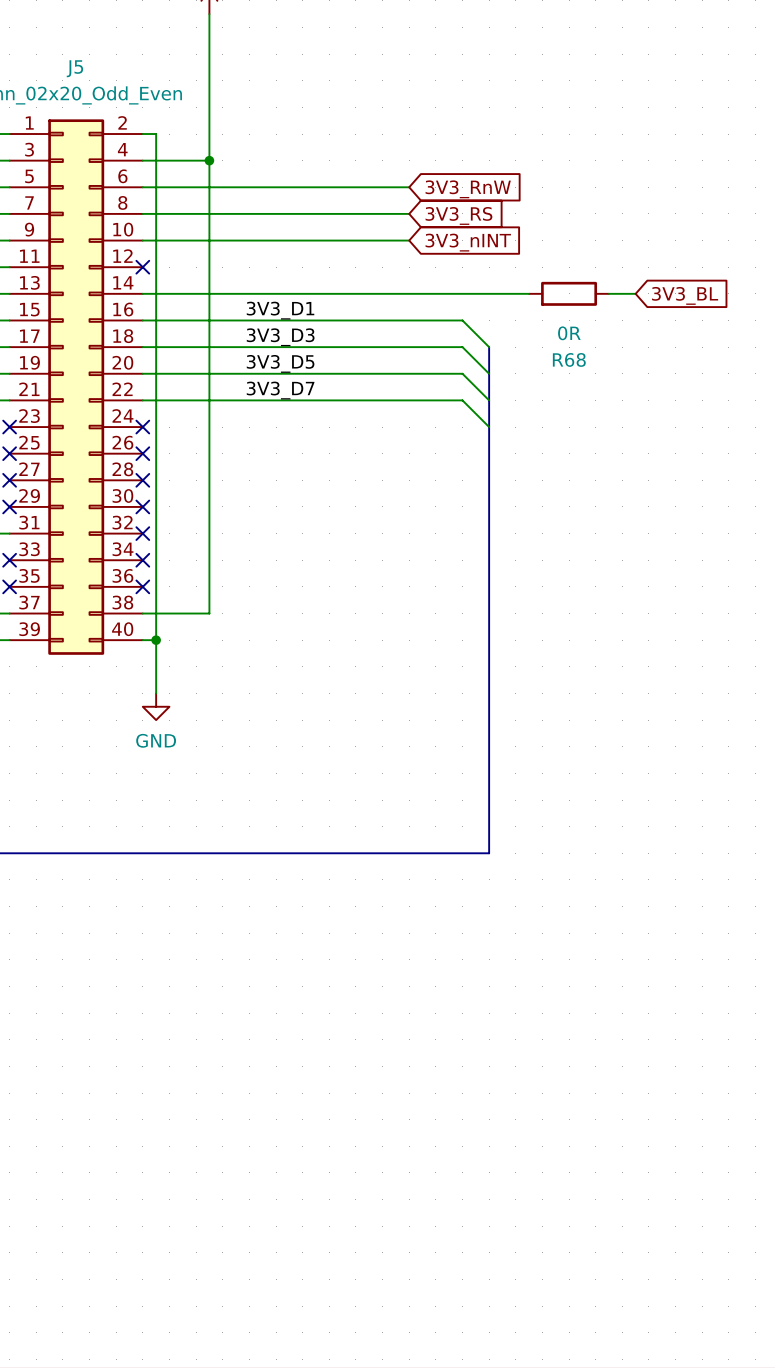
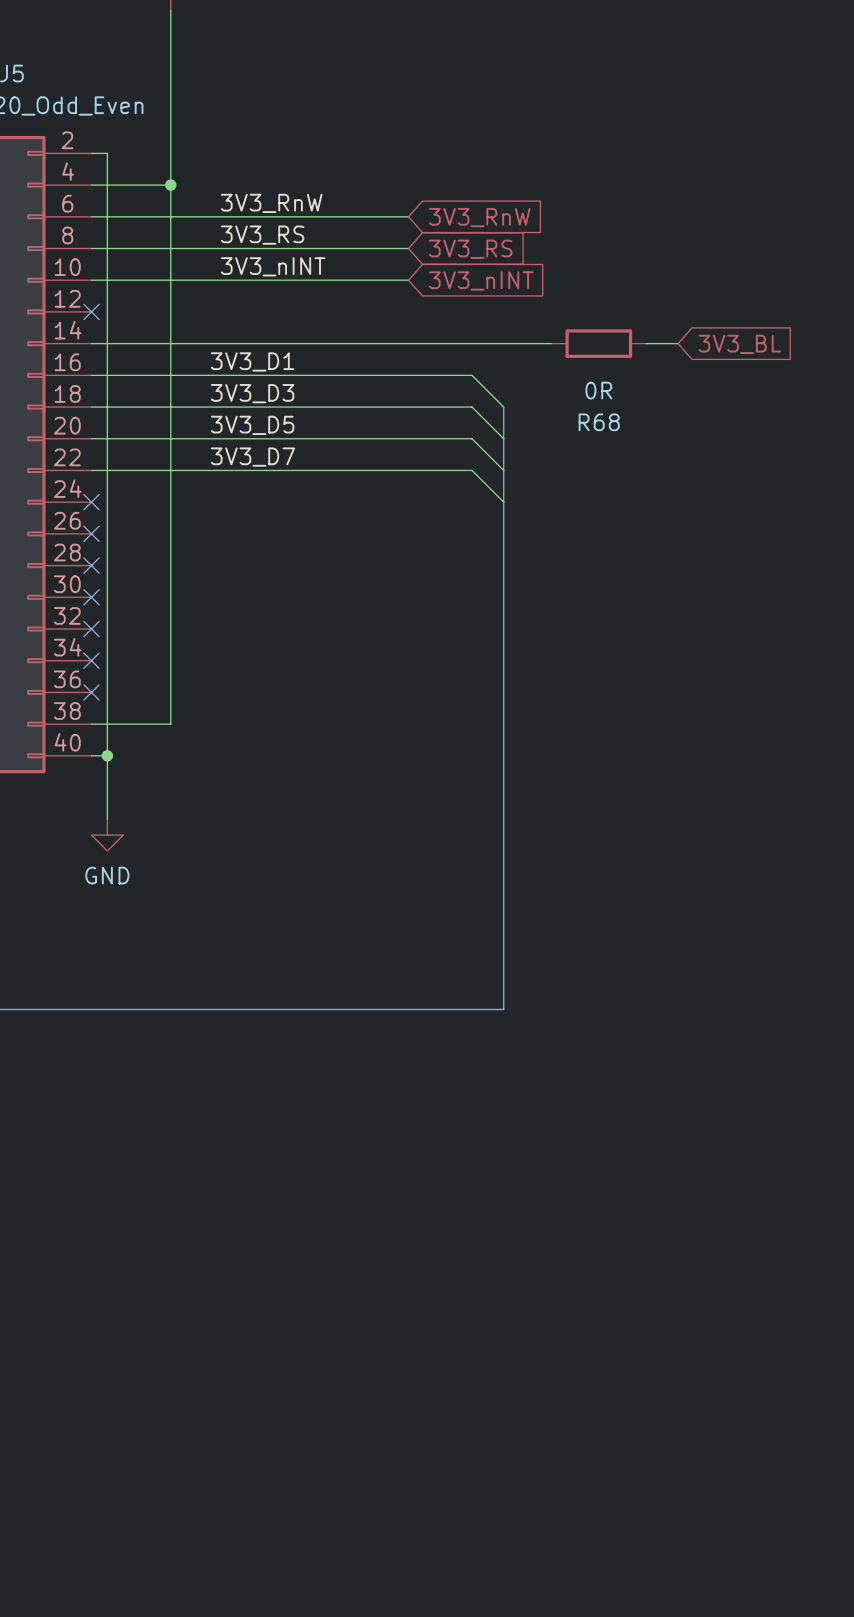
label: none -> 3V3_RnW (271, 203)
label: none -> 3V3_RS (262, 235)
label: none -> 3V3_nINT (273, 266)

